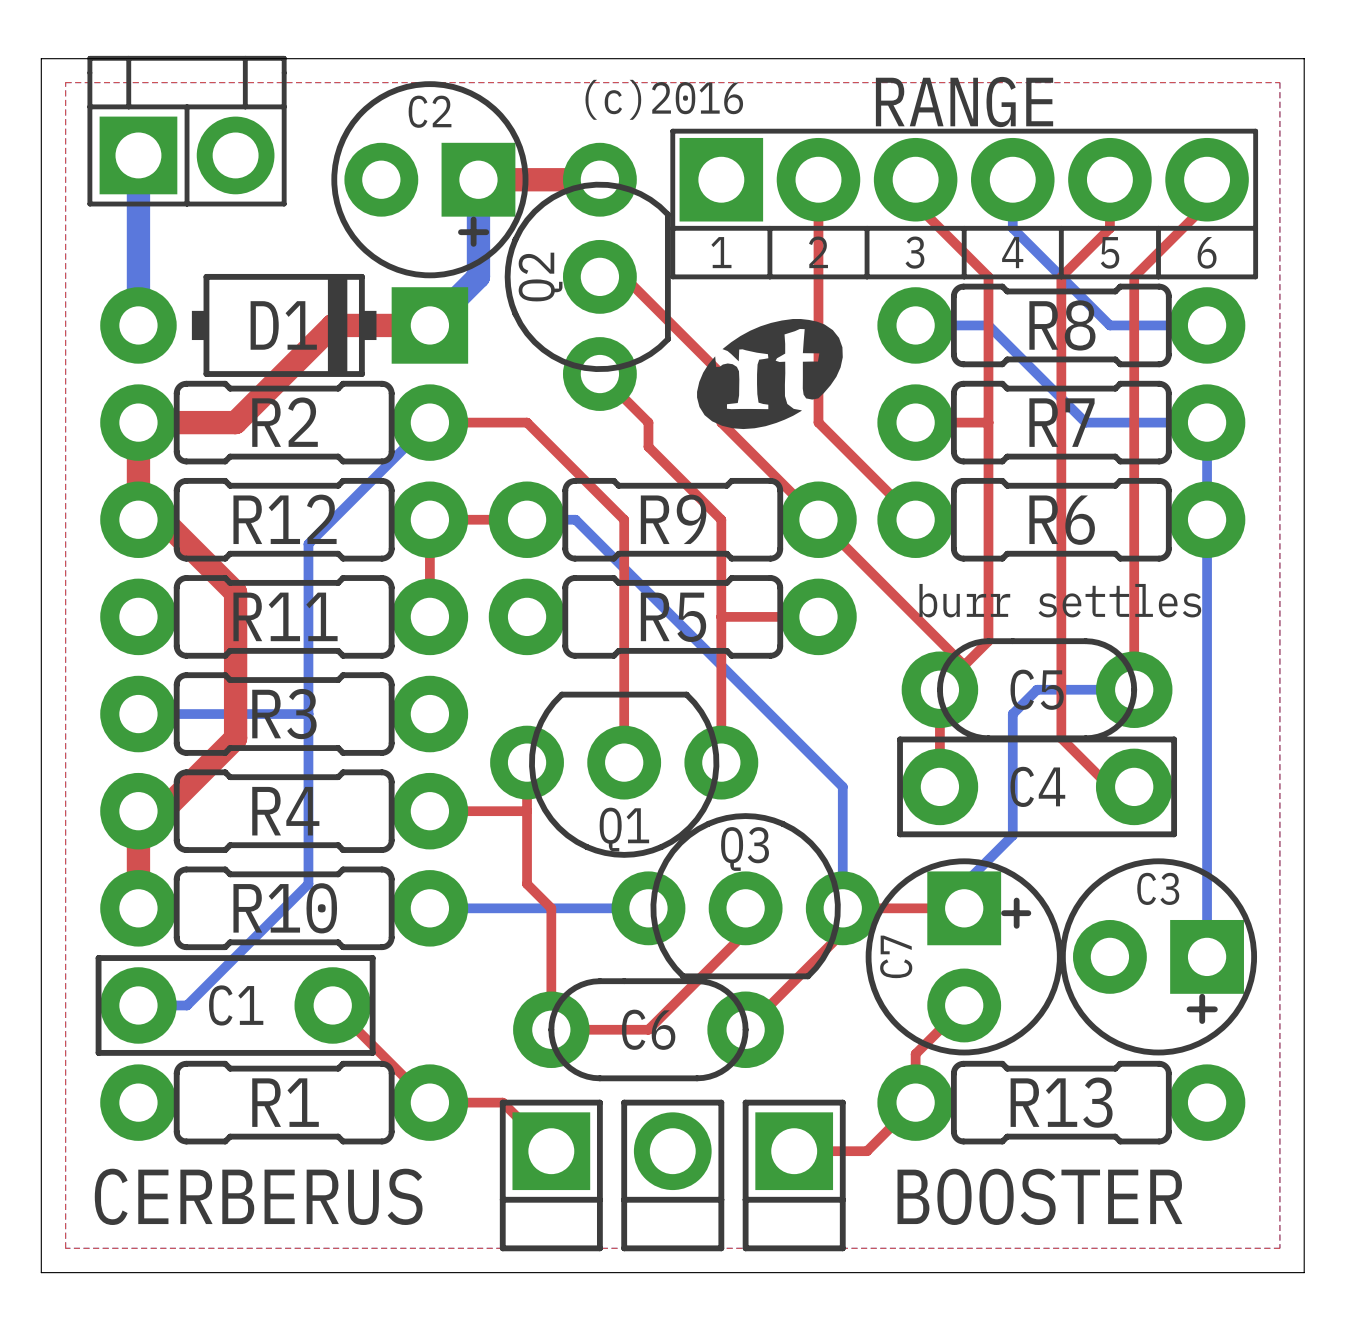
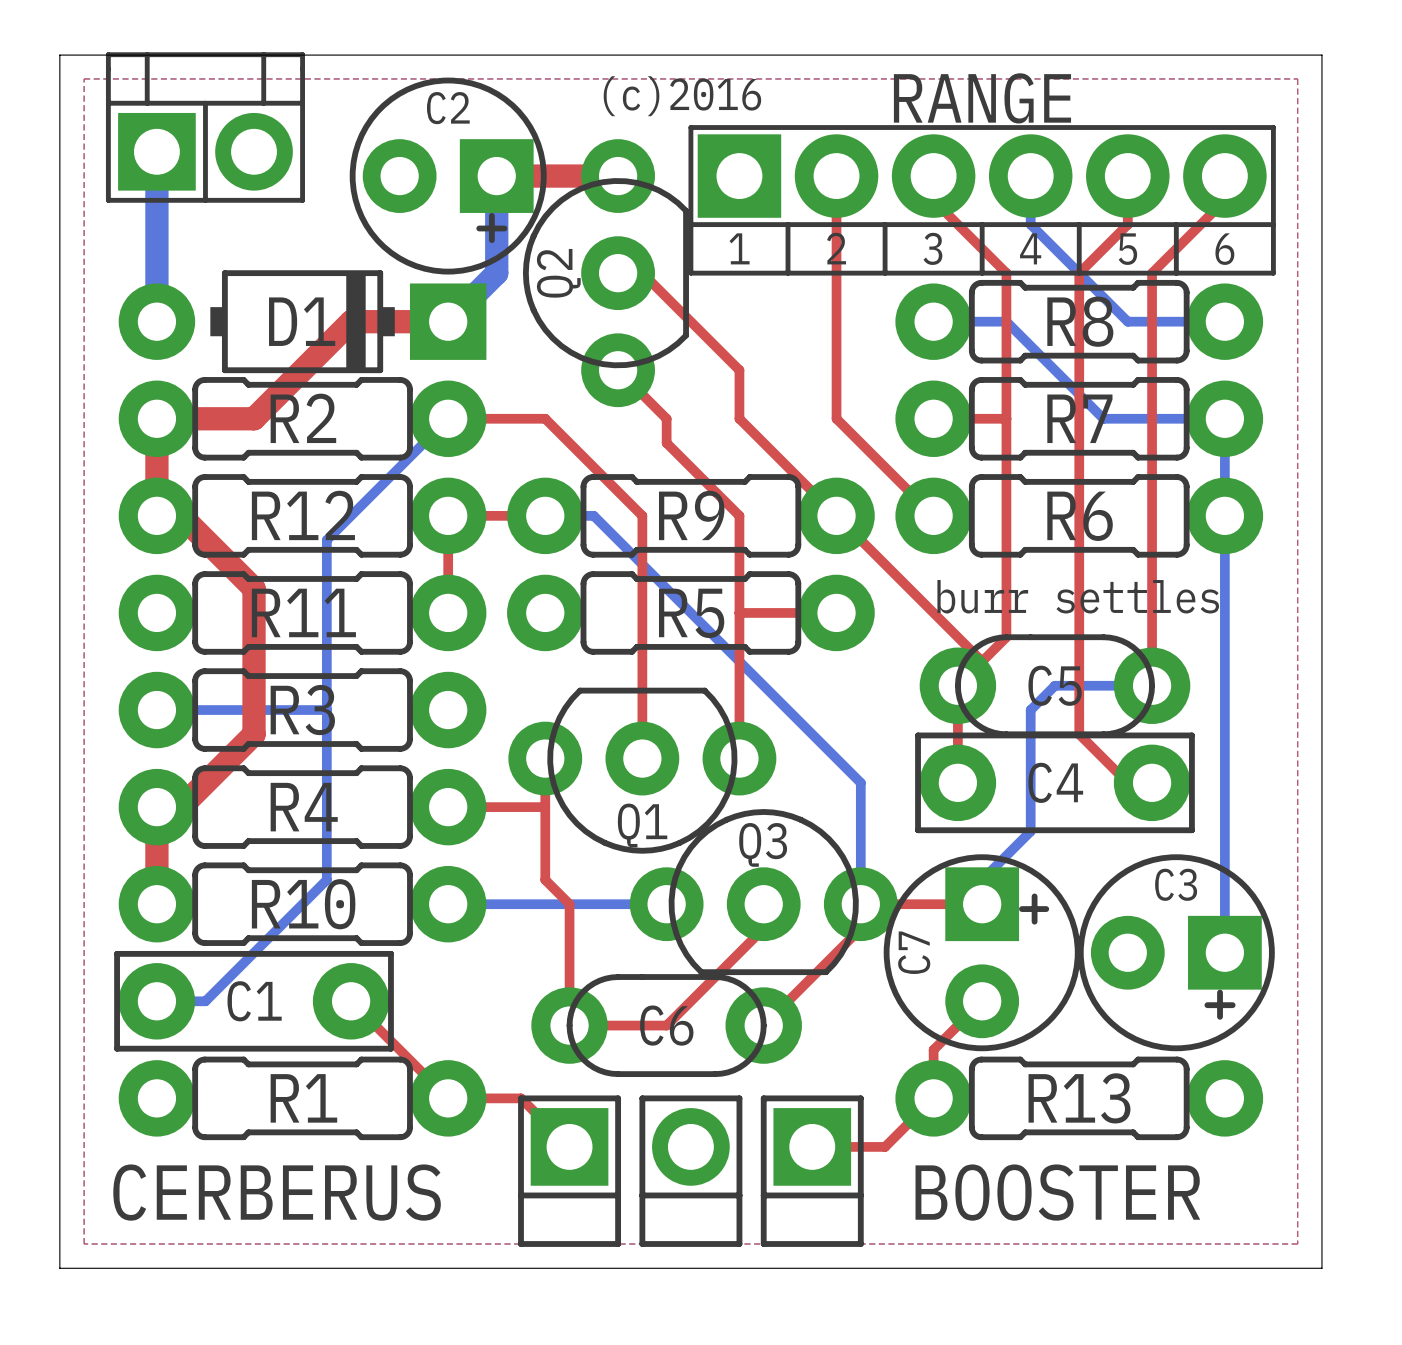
drawing: [697, 319, 843, 430] -> none

